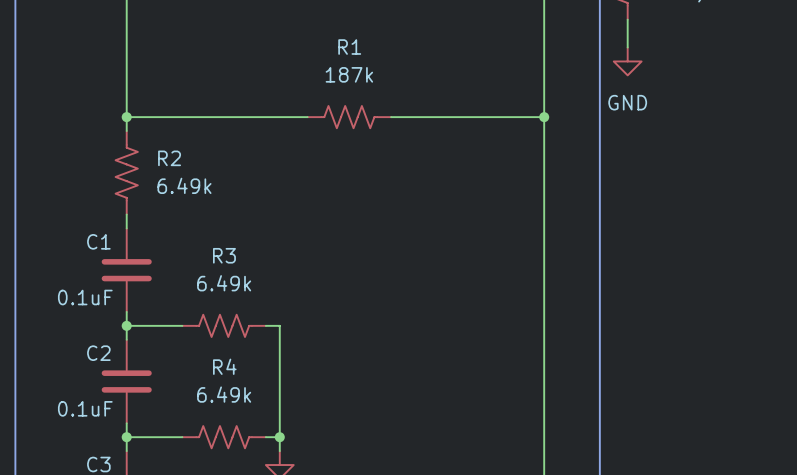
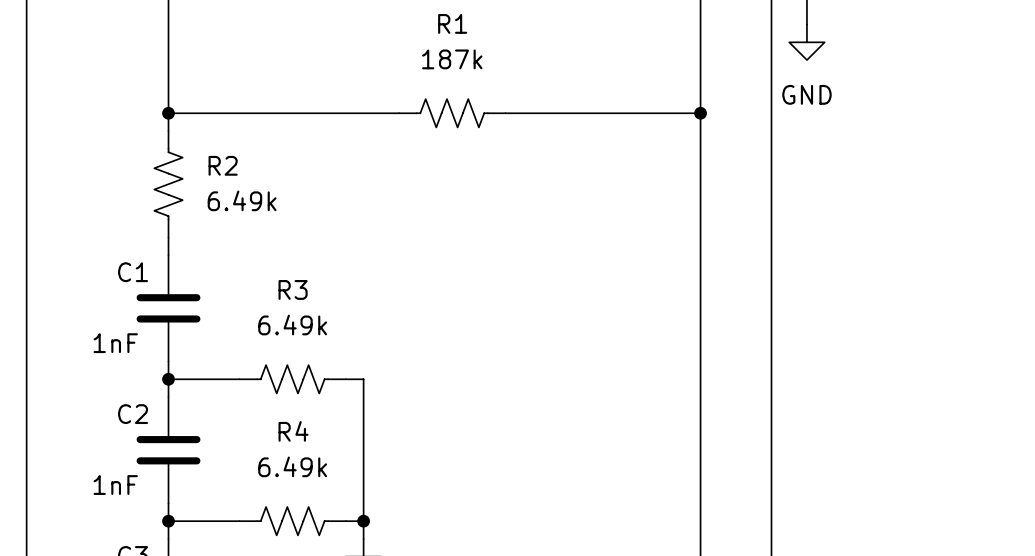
C1 value: 0.1uF (85, 297) -> 1nF (115, 343)
C2 value: 0.1uF (85, 408) -> 1nF (115, 485)

